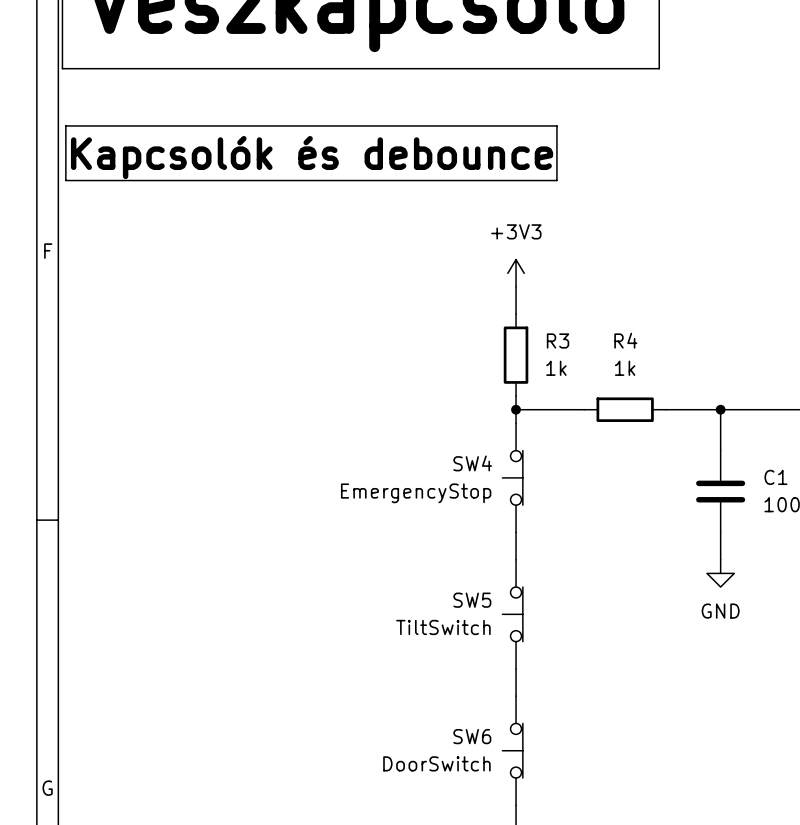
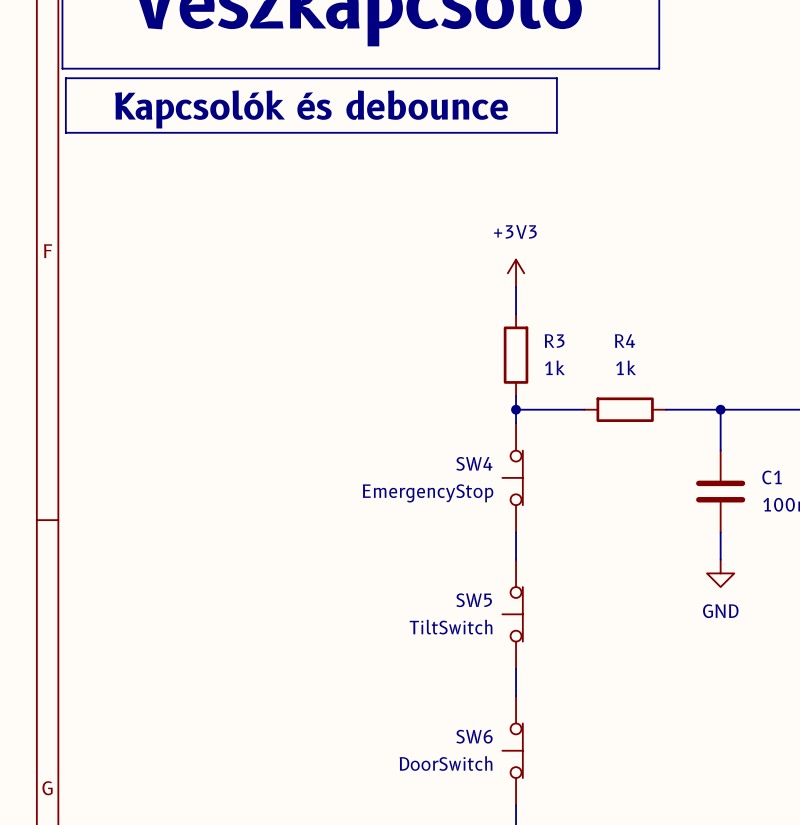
line: (65, 125) (556, 125) -> (65, 125) (65, 78) (556, 78) (556, 125)
line: (65, 132) (65, 180) (556, 180) (556, 132) -> (65, 132) (556, 132)
text position: Kapcsolók és debounce (312, 157) -> Kapcsolók és debounce (311, 109)

